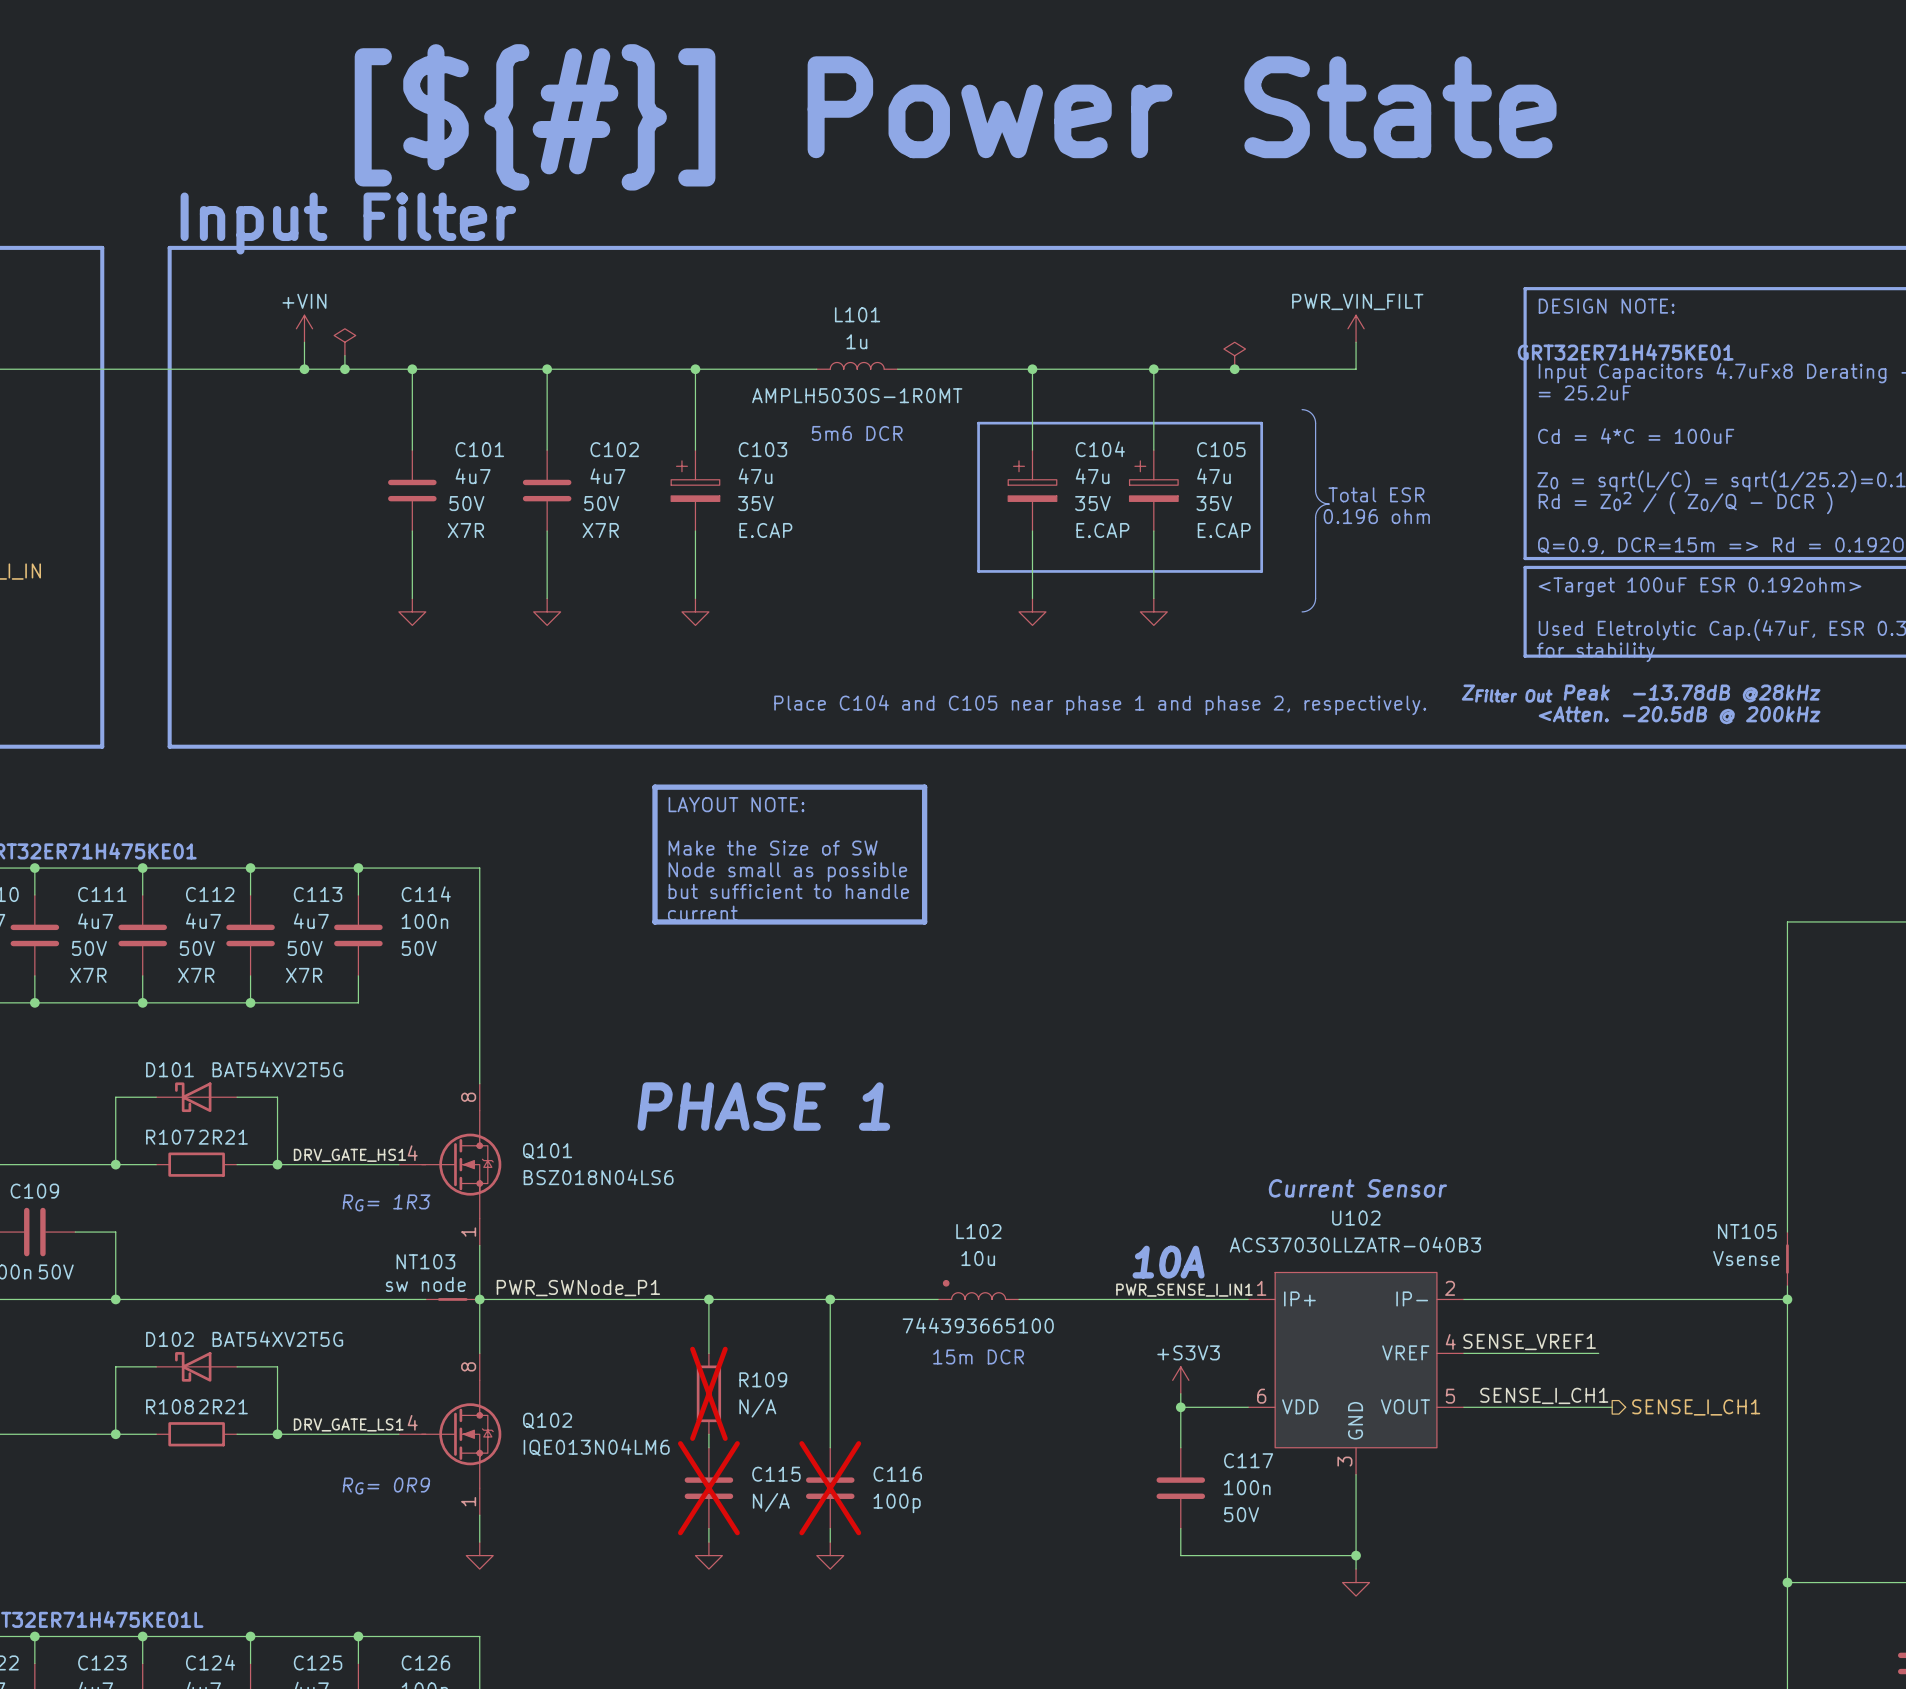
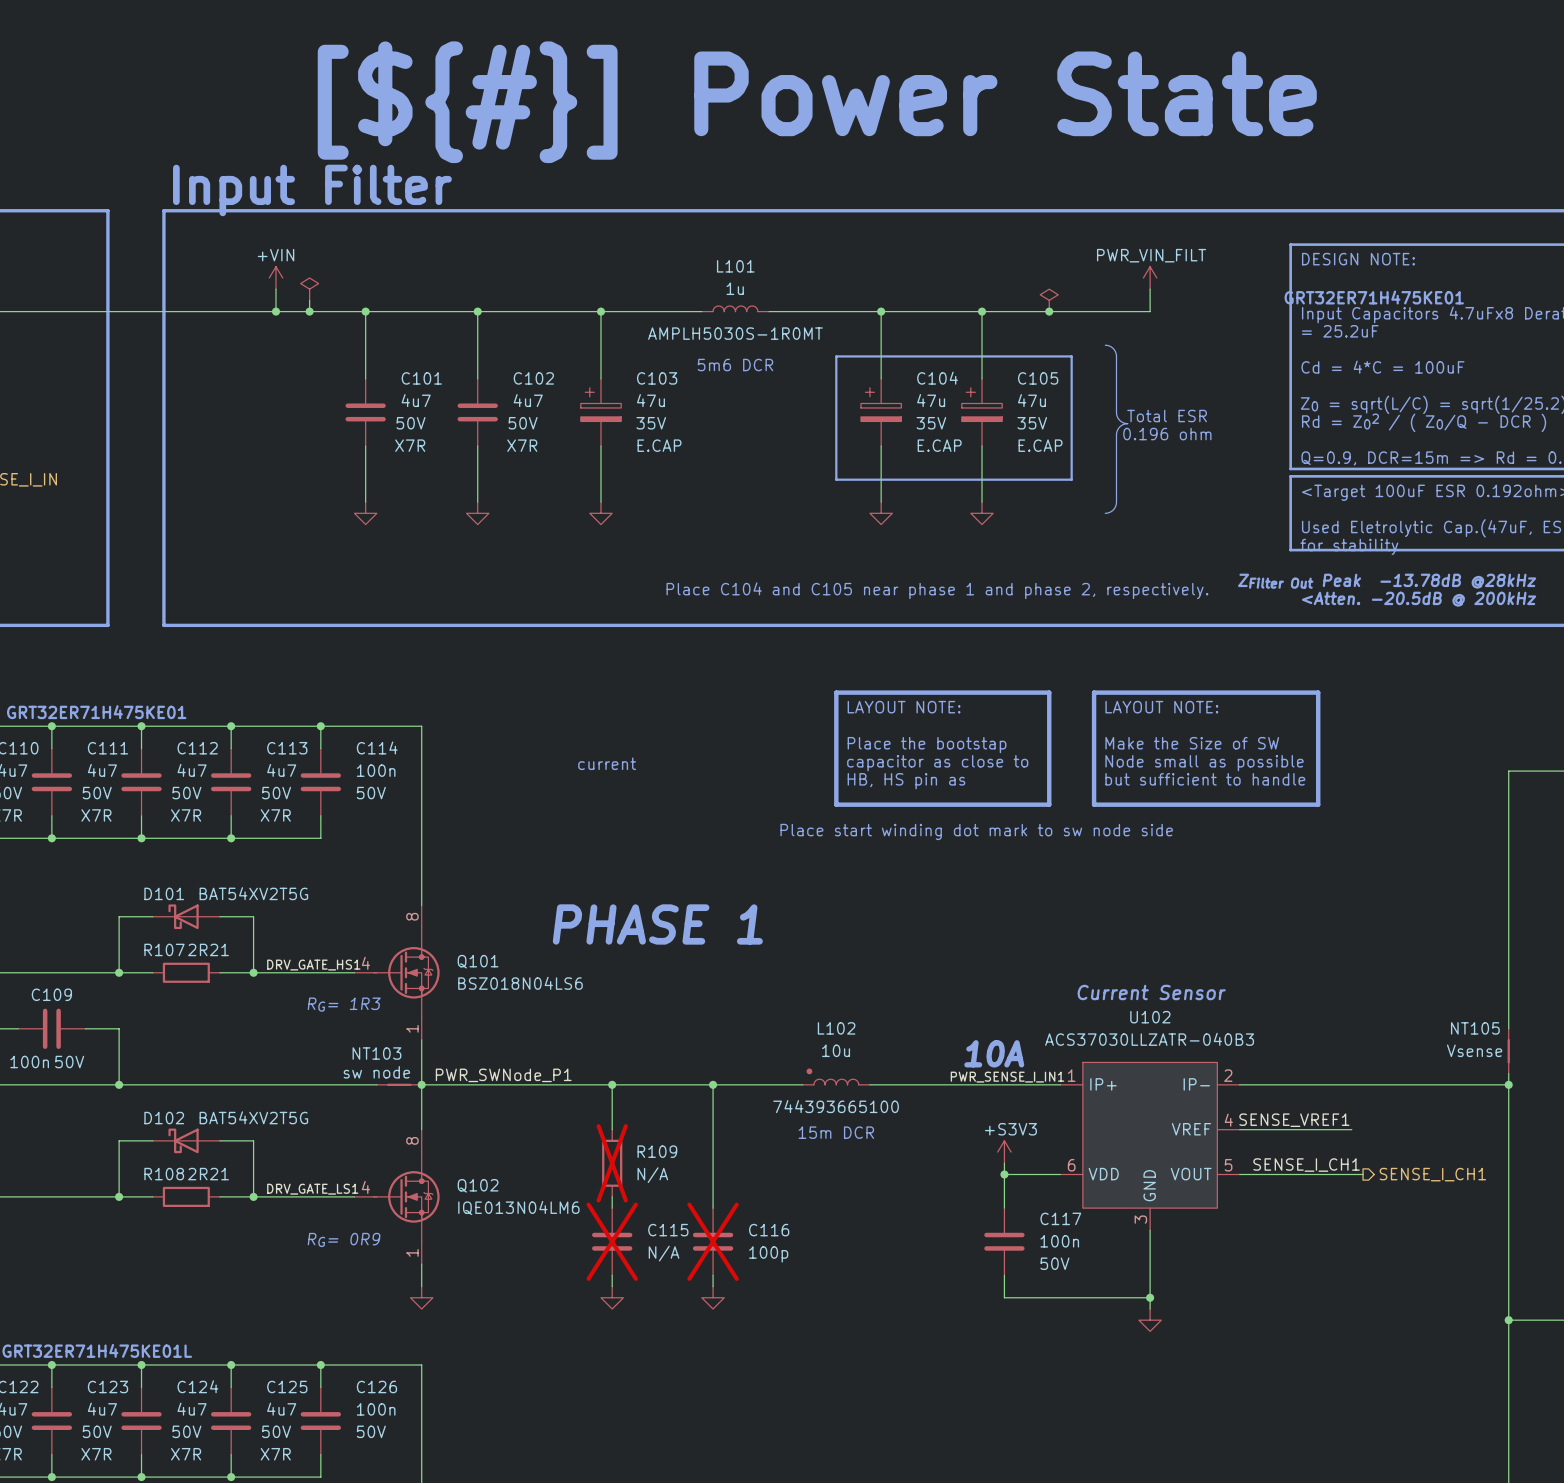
line: (655, 787) (924, 787) (924, 921) (655, 921) (655, 787) -> none
text: LAYOUT NOTE: (736, 804) -> none
line: none -> (836, 692) (1049, 692) (1049, 804) (836, 804) (836, 692)
line: none -> (1094, 692) (1318, 692) (1318, 804) (1094, 804) (1094, 692)
text: none -> LAYOUT NOTE: (904, 707)
text: none -> LAYOUT NOTE: (1161, 707)
text: Make the Size of SW (773, 848) -> none
text: Node small as possible (787, 872) -> none
text: none -> Make the Size of SW (1192, 743)
text: none -> Place the bootstap (927, 745)
text: but sufficient to handle (788, 891) -> none
text: none -> capacitor as close to (937, 763)
text: none -> Node small as possible (1204, 763)
text: none -> but sufficient to handle (1205, 779)
text: none -> HB, HS pin as (906, 781)
text: none -> Place start winding dot mark to sw node side (976, 831)

